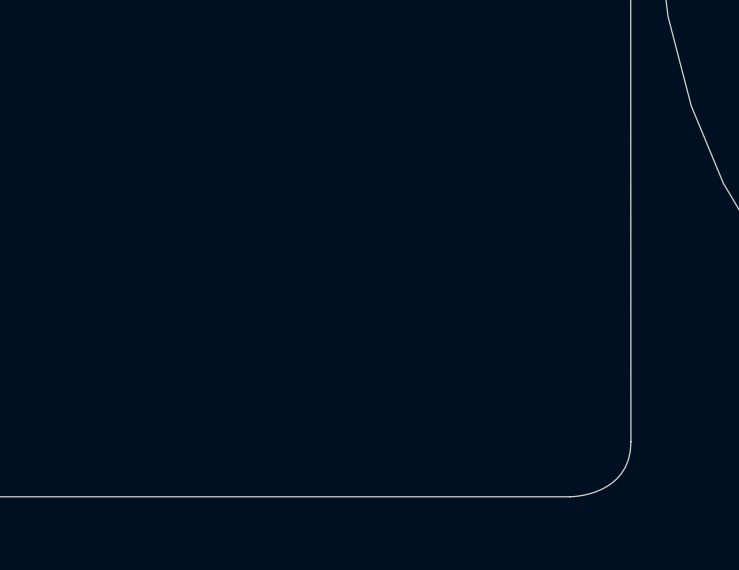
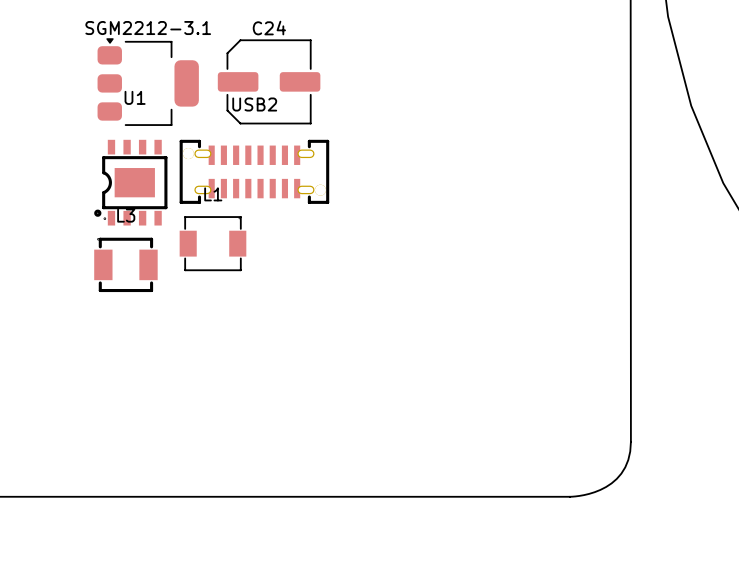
C24: none -> (269, 81)
SGM2212-3.1: none -> (148, 82)
USB2: none -> (254, 171)
U1: none -> (130, 182)
L1: none -> (212, 243)
L3: none -> (125, 264)

